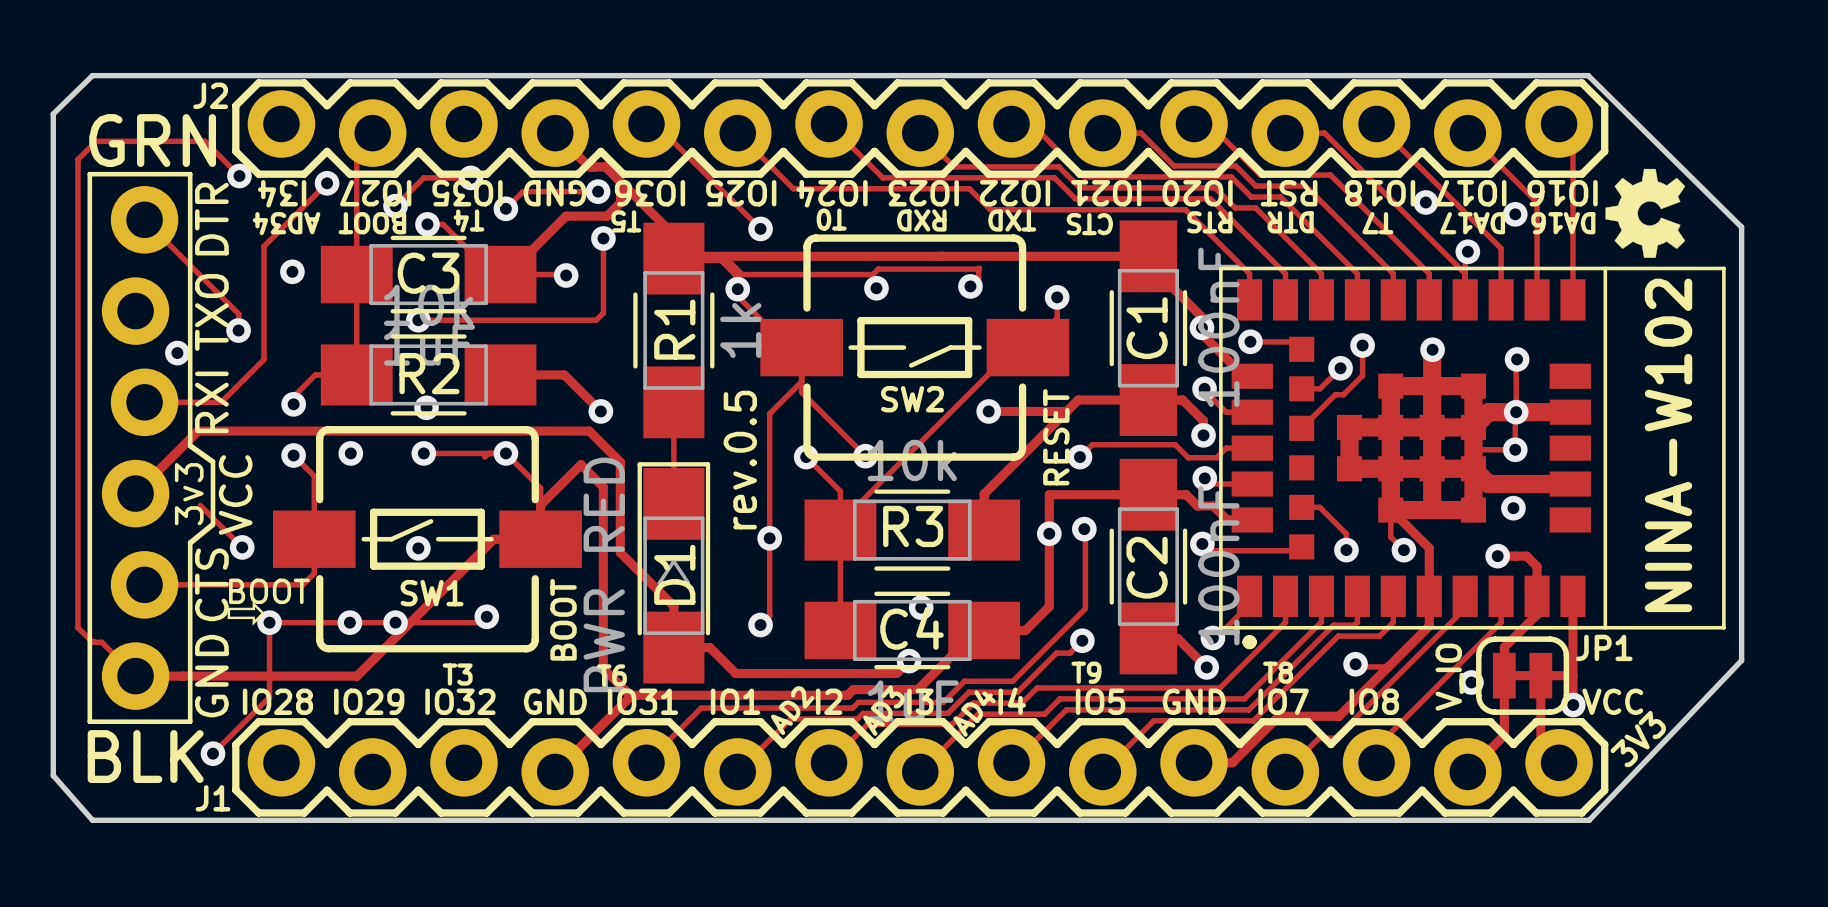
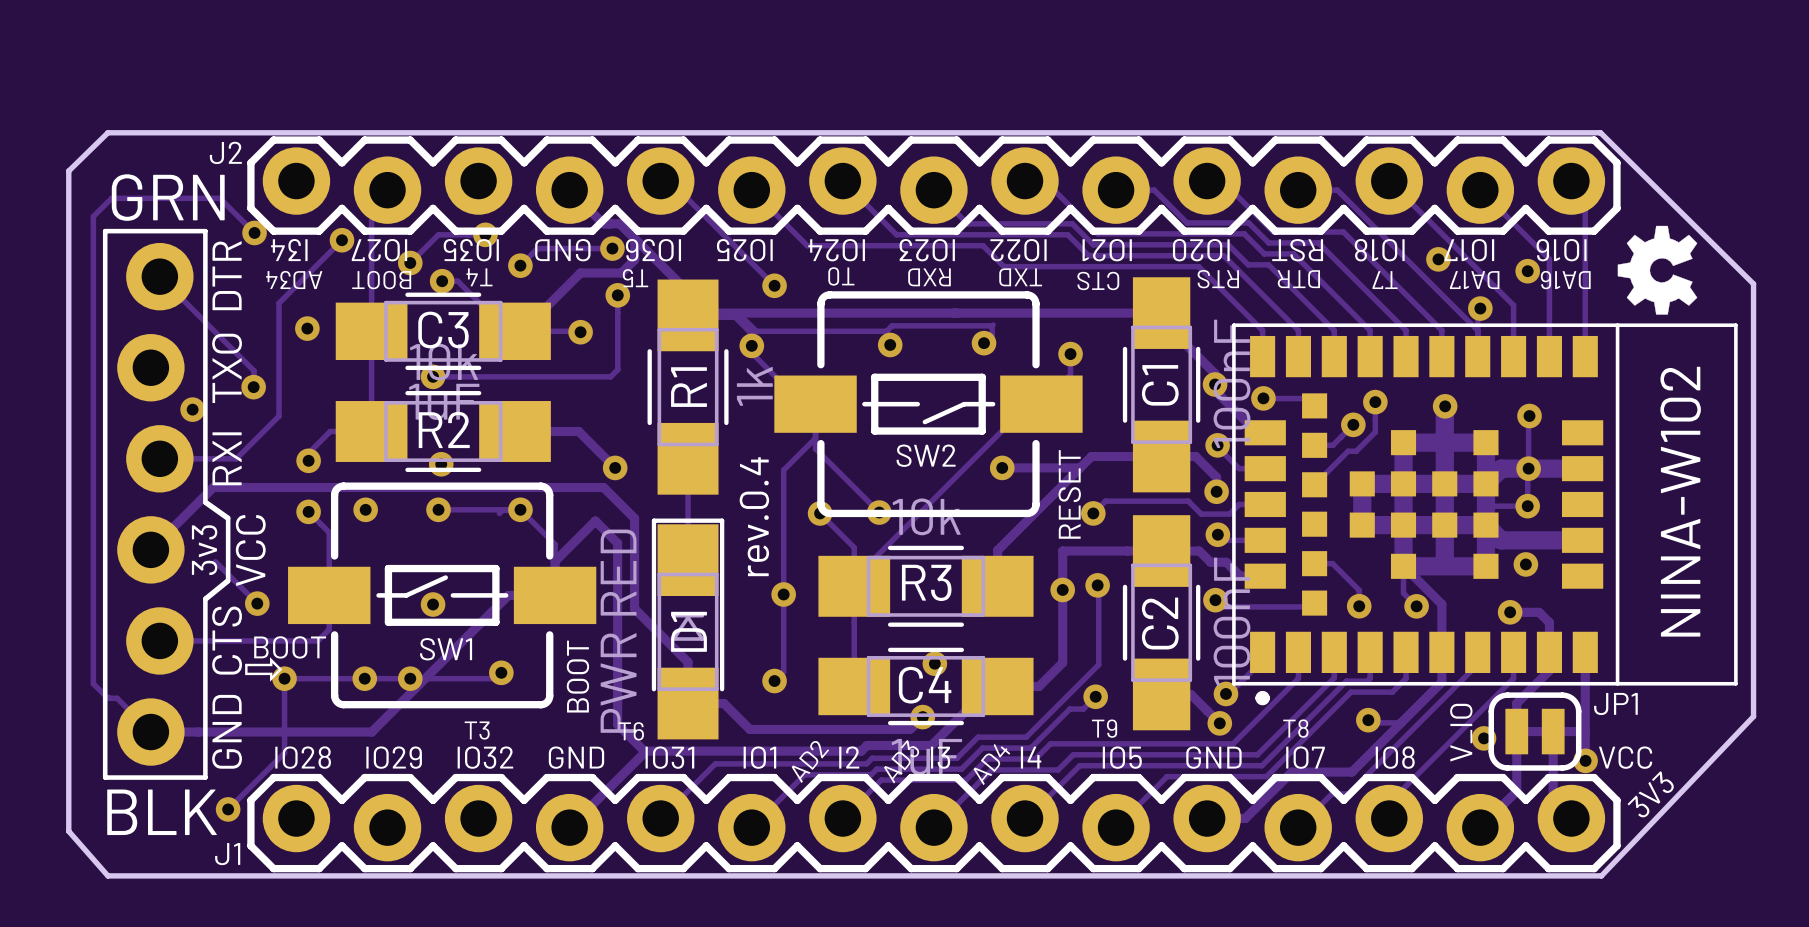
text: rev.0.5 (740, 460) -> rev.0.4 (754, 516)

